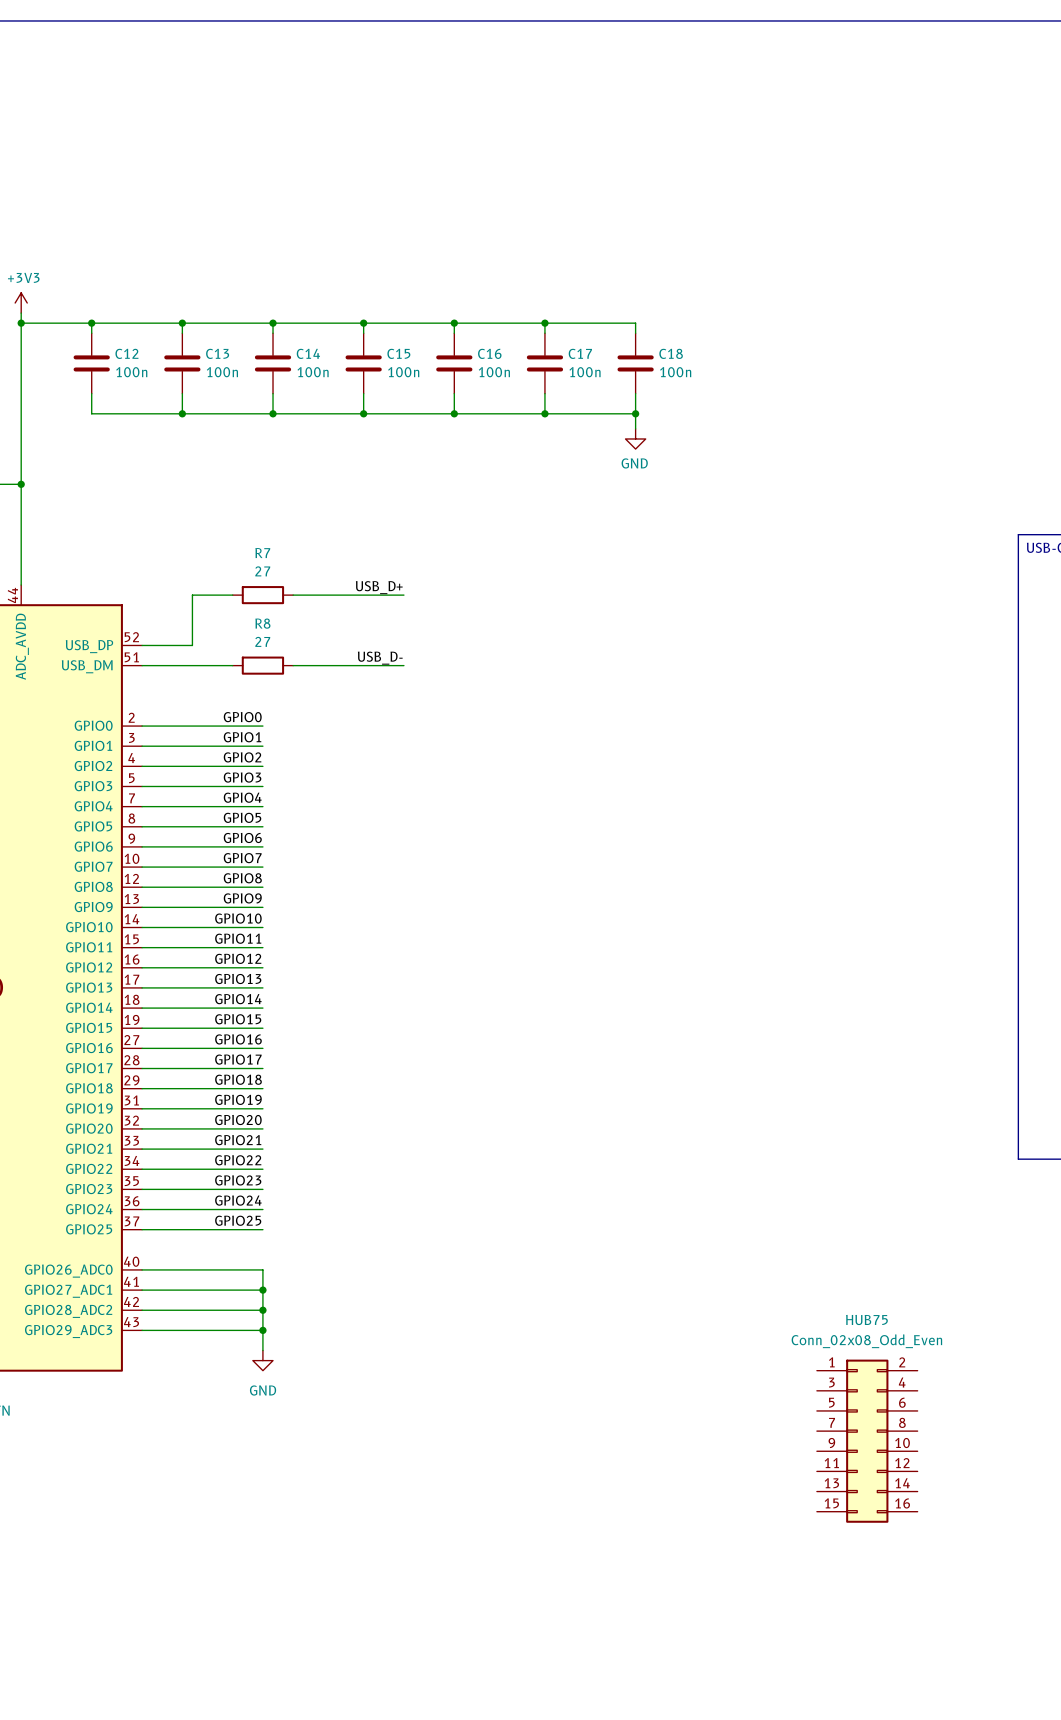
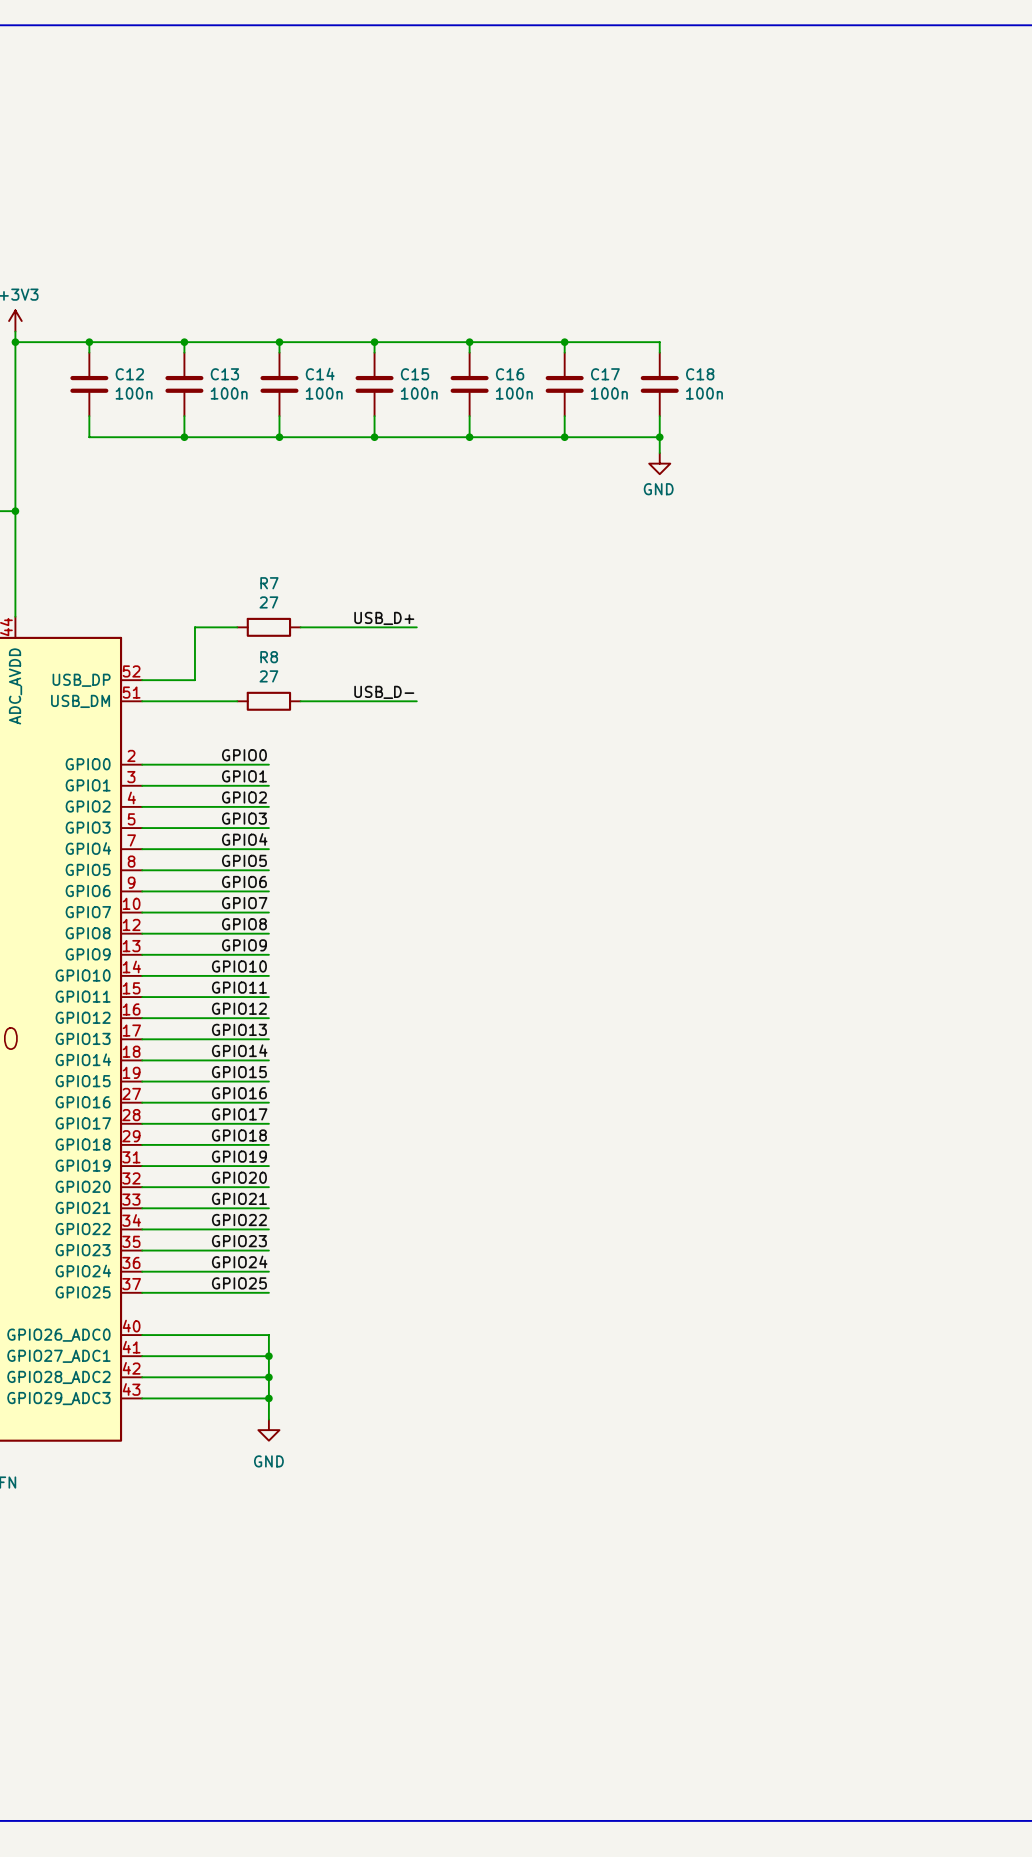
HUB75: Conn_02x08_Odd_Even (867, 1441) -> none

